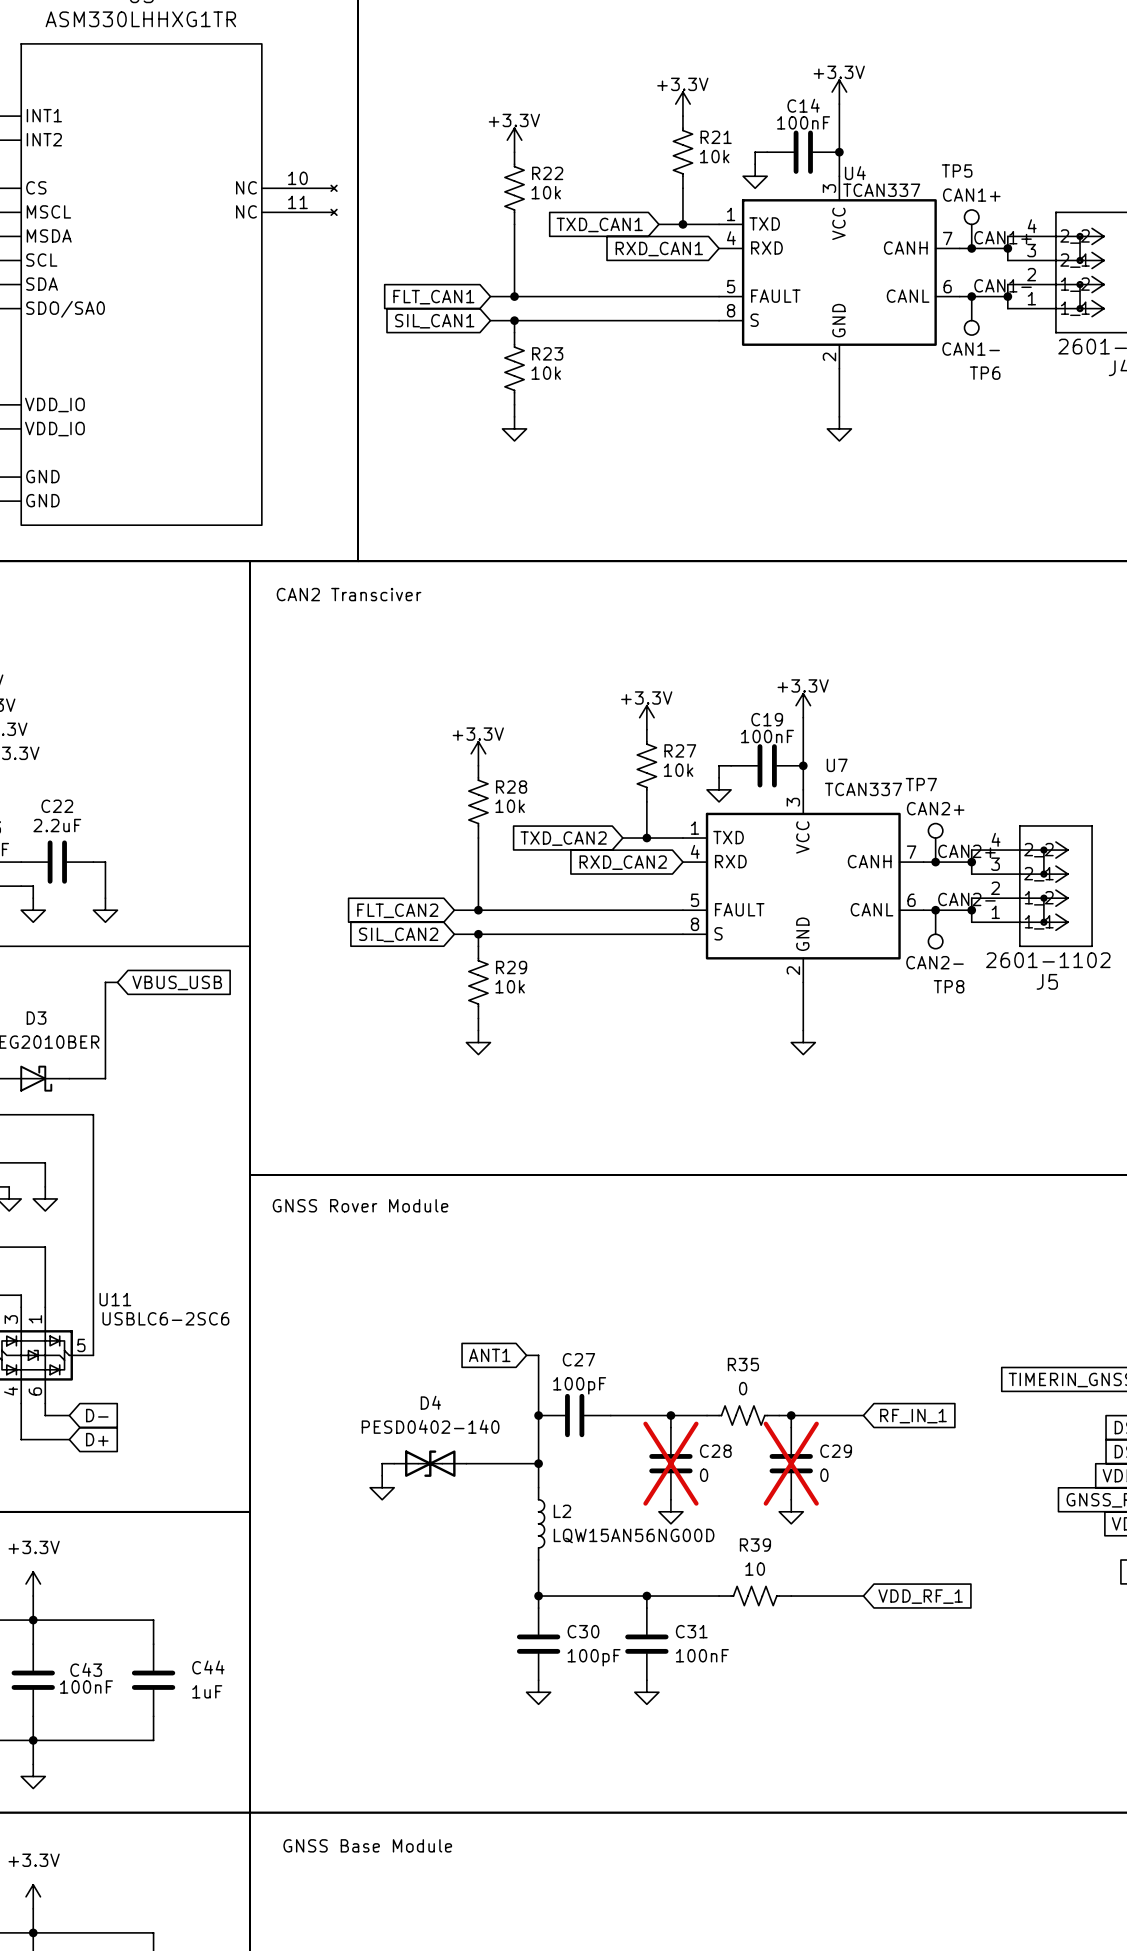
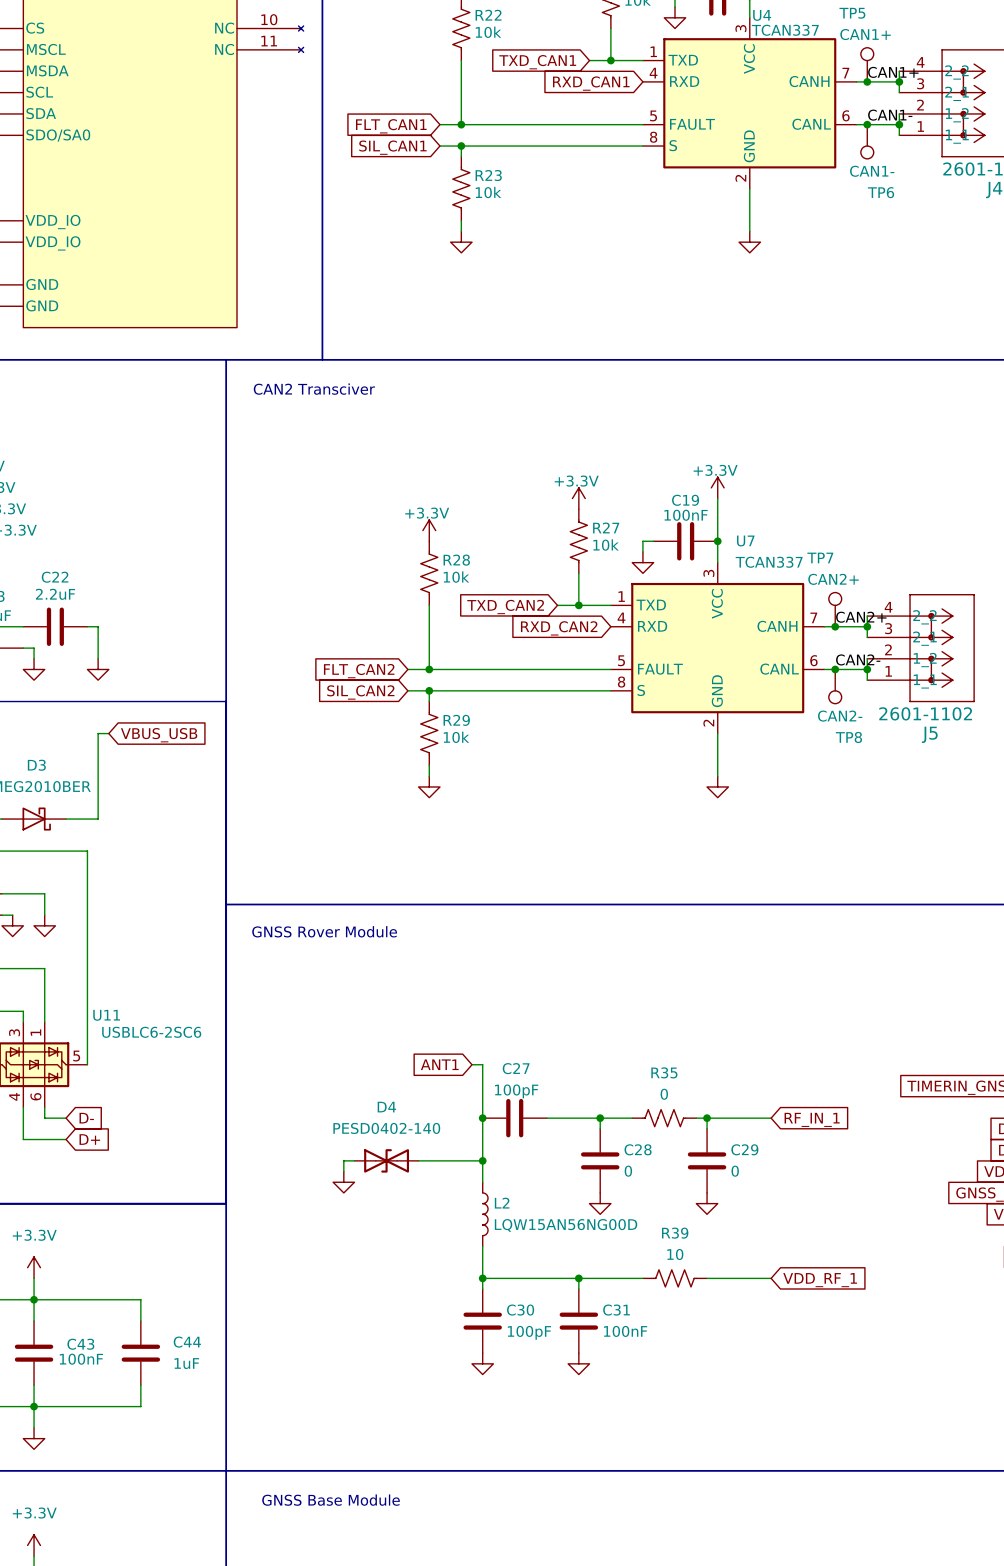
C28 do-not-place cross: (670, 1463) -> none
C29 do-not-place cross: (791, 1463) -> none

